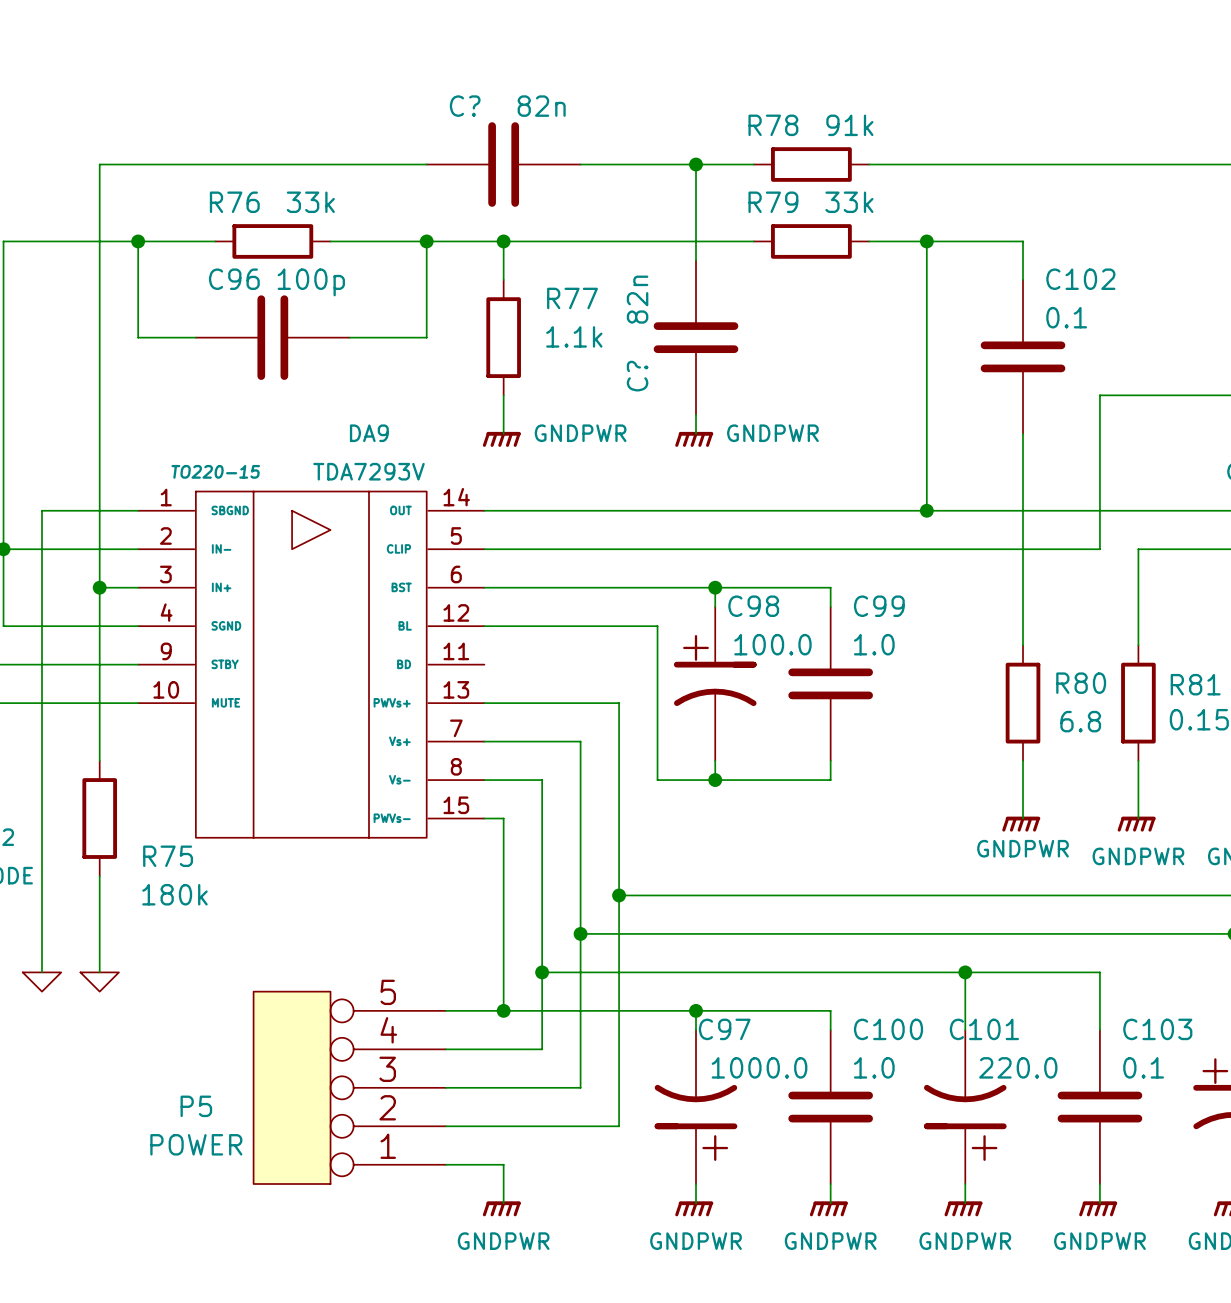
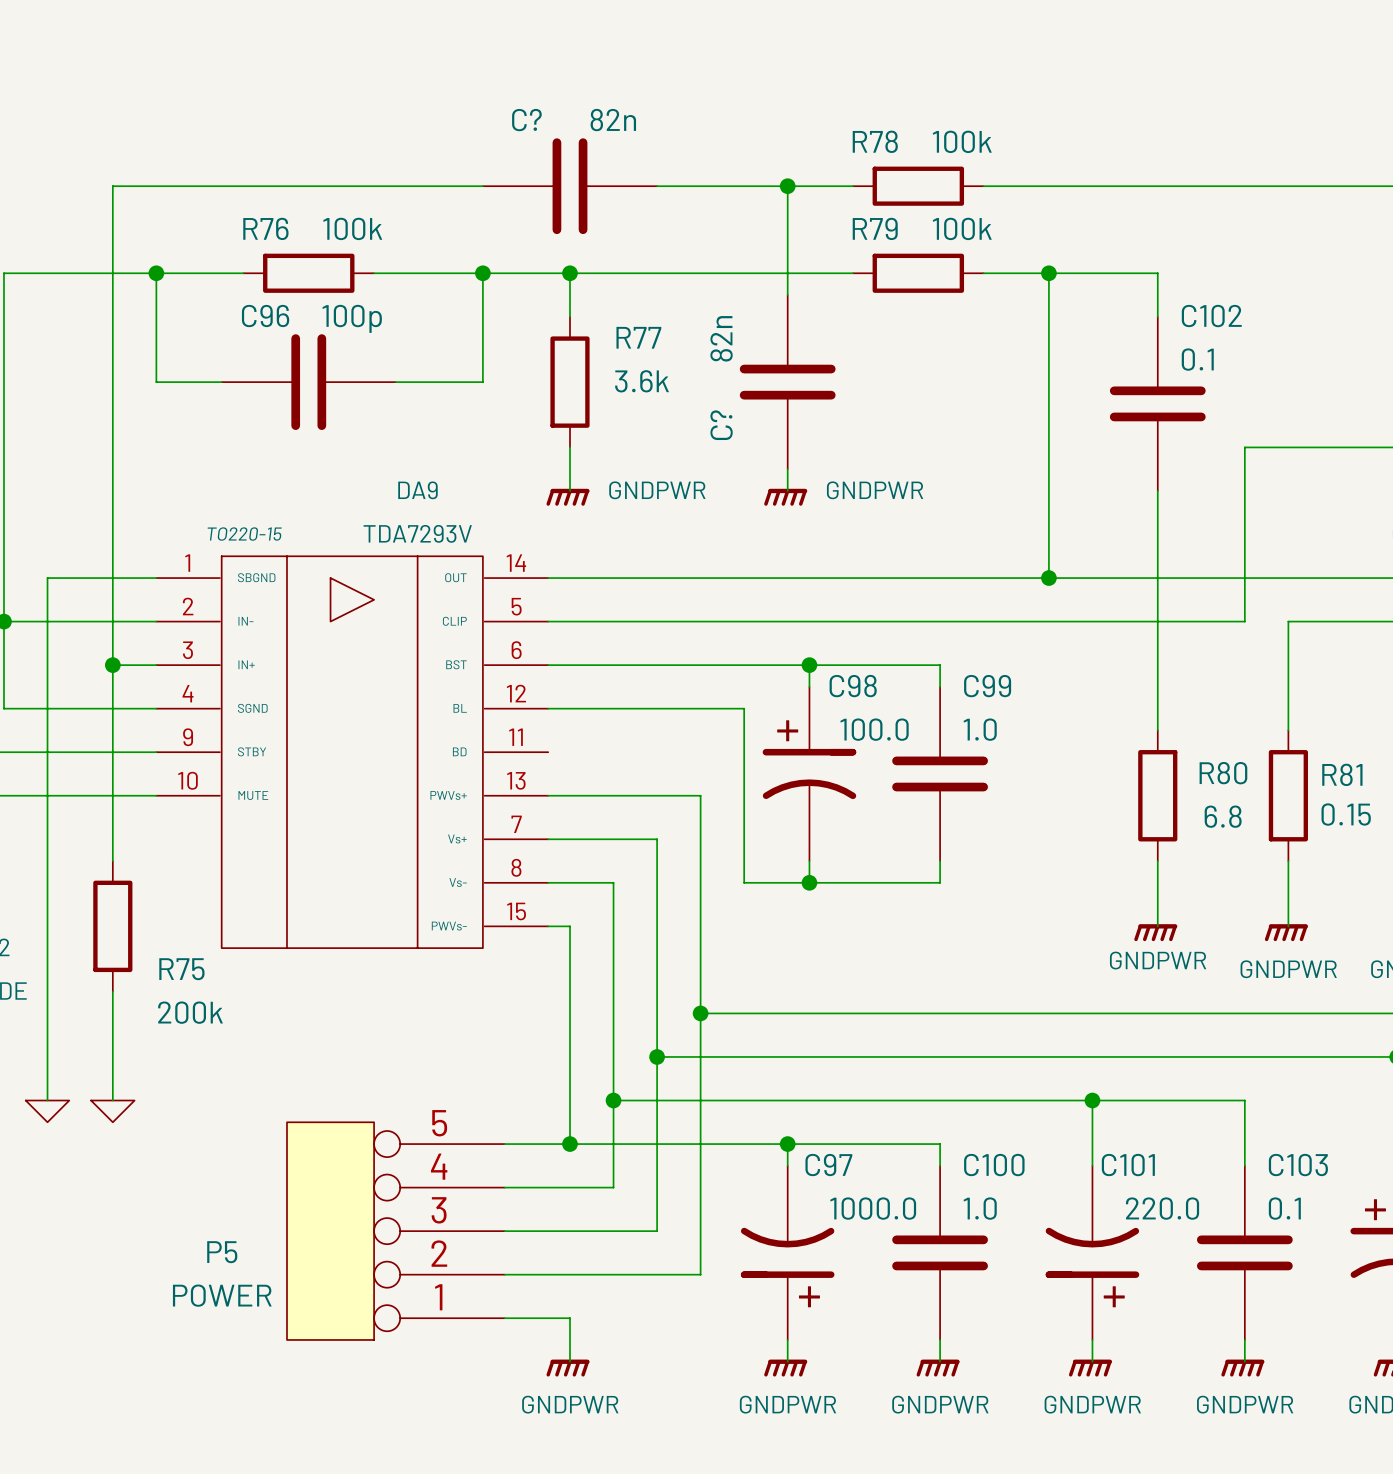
R78 value: 91k (849, 125) -> 100k (962, 141)
R76 value: 33k (310, 202) -> 100k (352, 228)
R79 value: 33k (849, 202) -> 100k (962, 228)
R77 value: 1.1k (574, 336) -> 3.6k (641, 381)
R75 value: 180k (174, 894) -> 200k (190, 1012)

